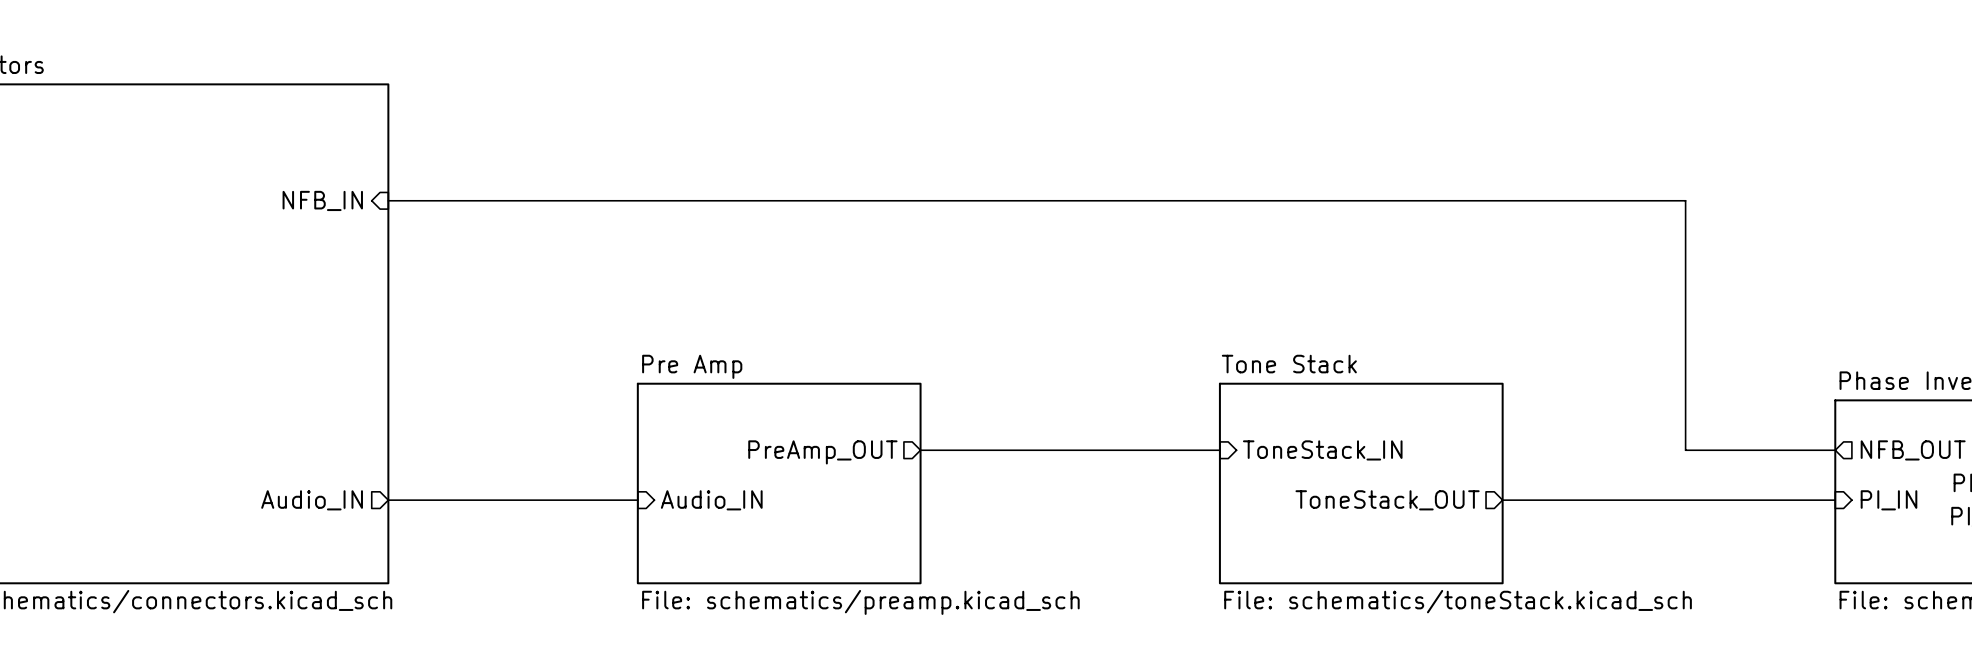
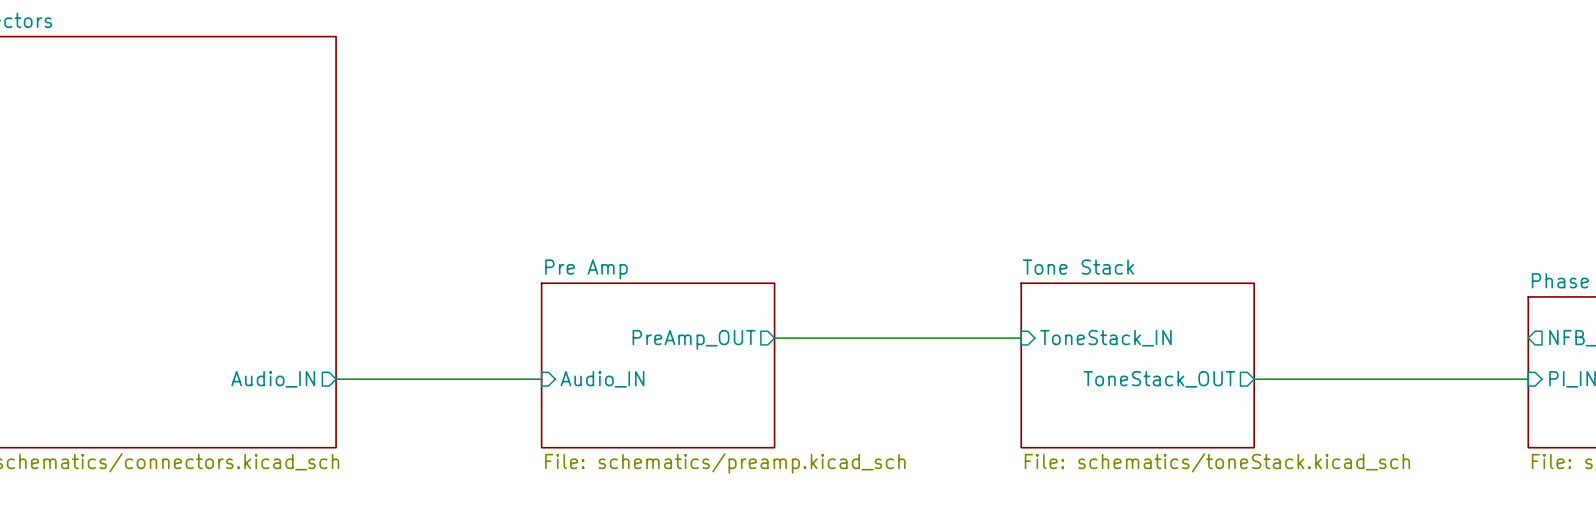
sheet pin: NFB_IN (322, 200) -> none
wire: (388, 200) (1685, 200) (1685, 450) (1835, 450) -> none

